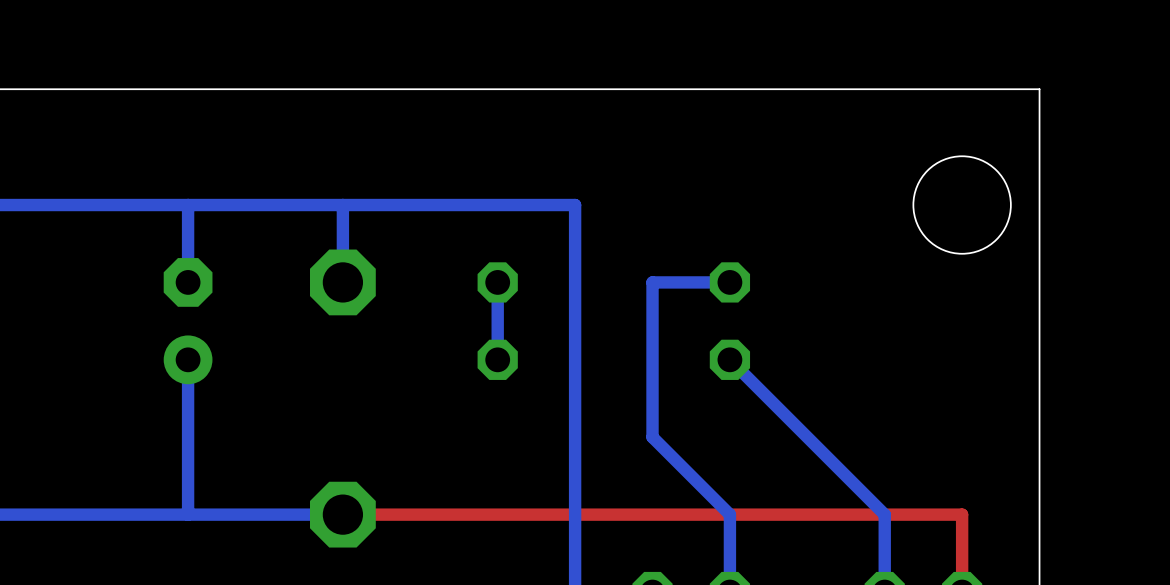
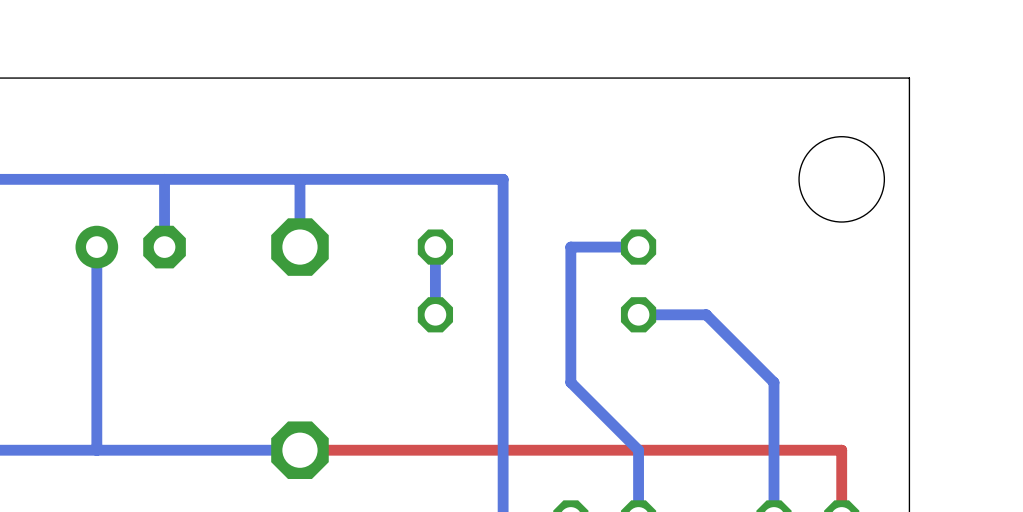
bottom track: none -> (96, 247) (96, 450)
part rotation: 0° (188, 321) -> 90° clockwise (130, 247)
bottom track: (188, 359) (188, 514) -> none
bottom track: (729, 359) (884, 514) -> (638, 314) (706, 314) (773, 382) (773, 450)

